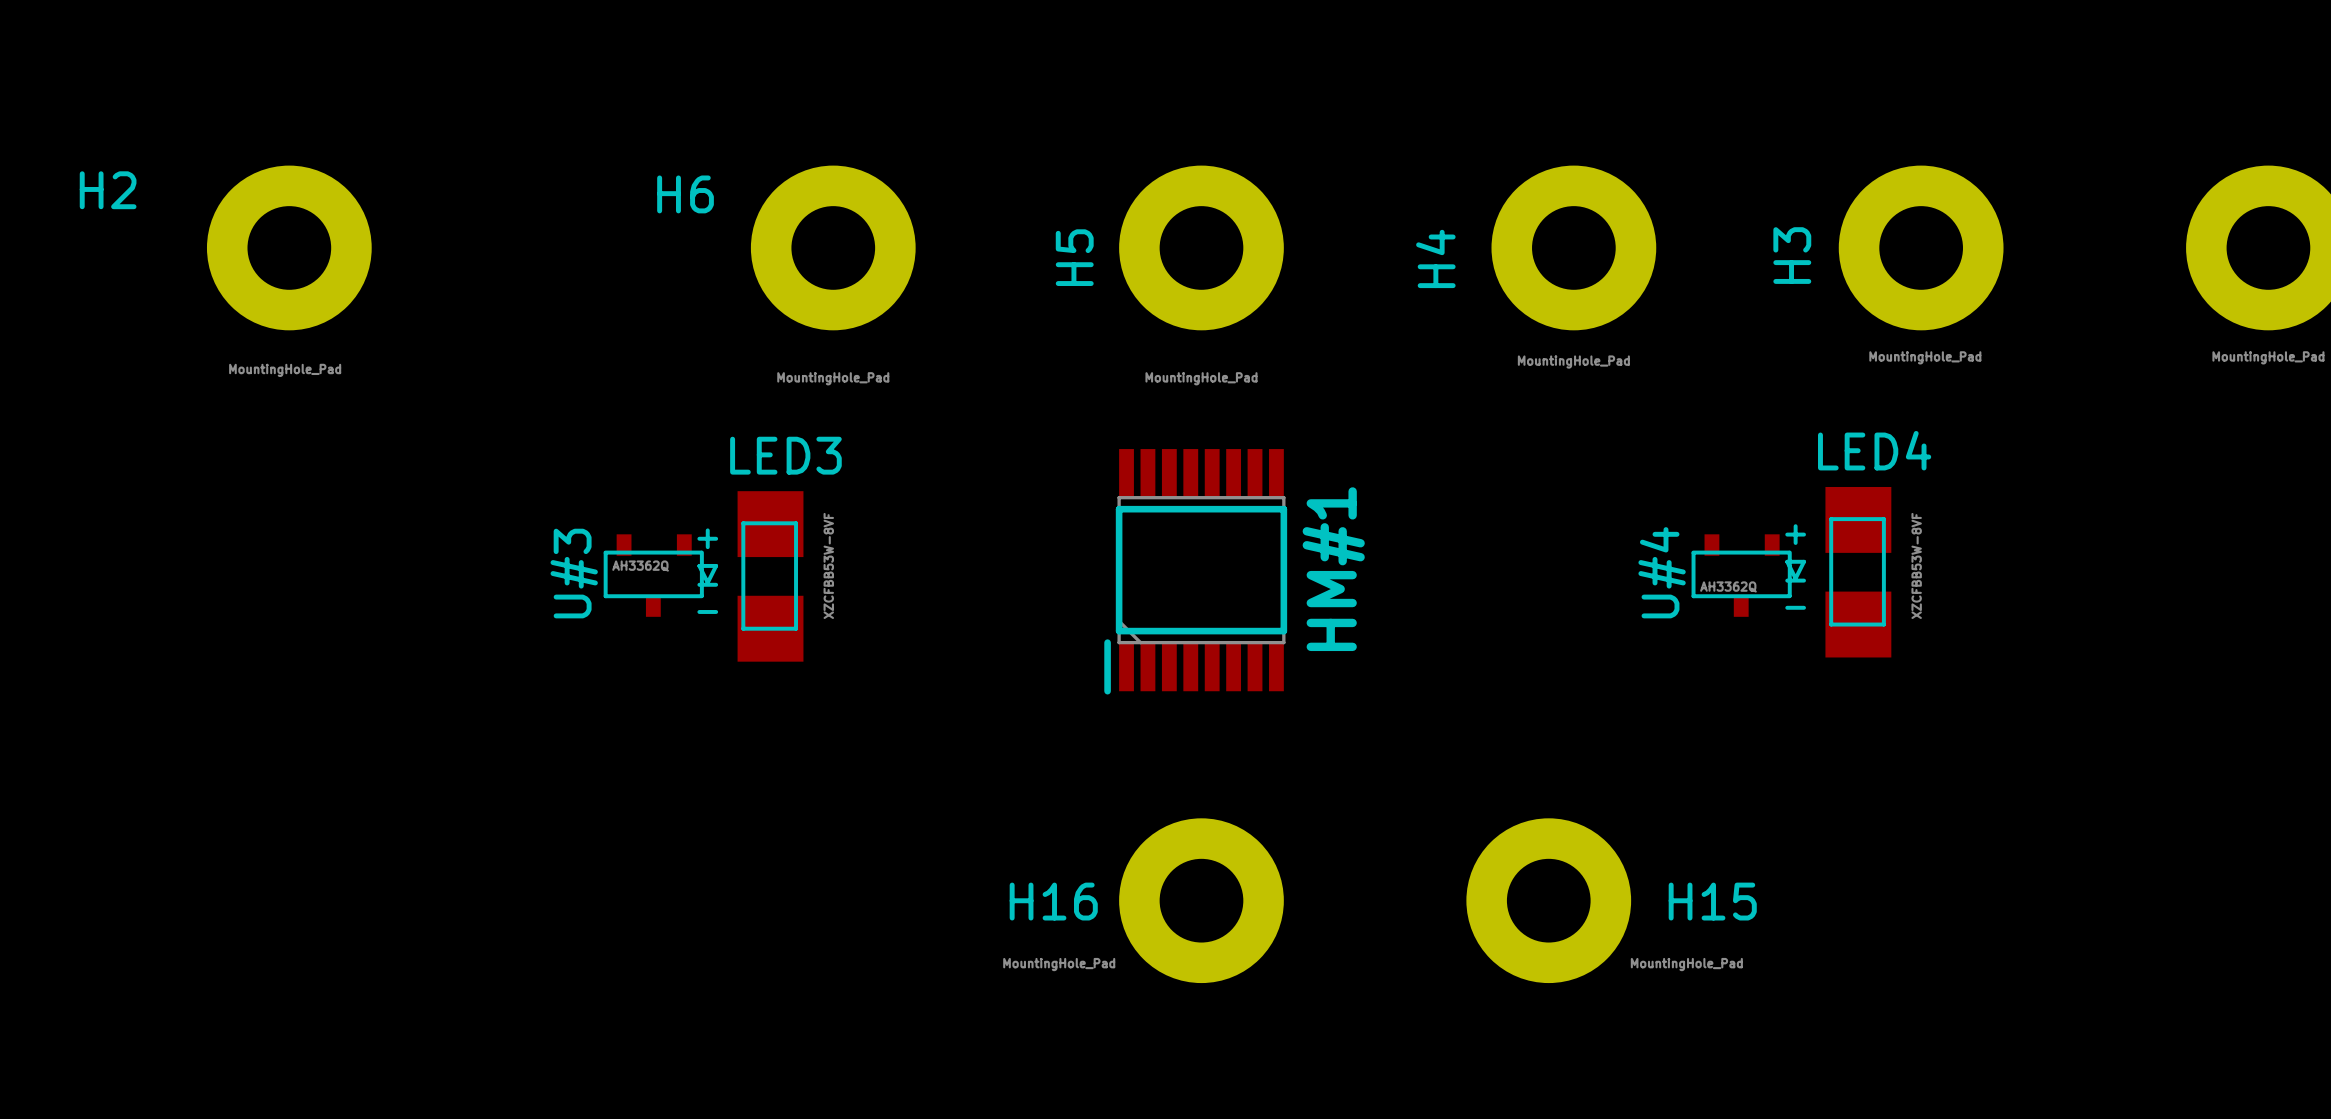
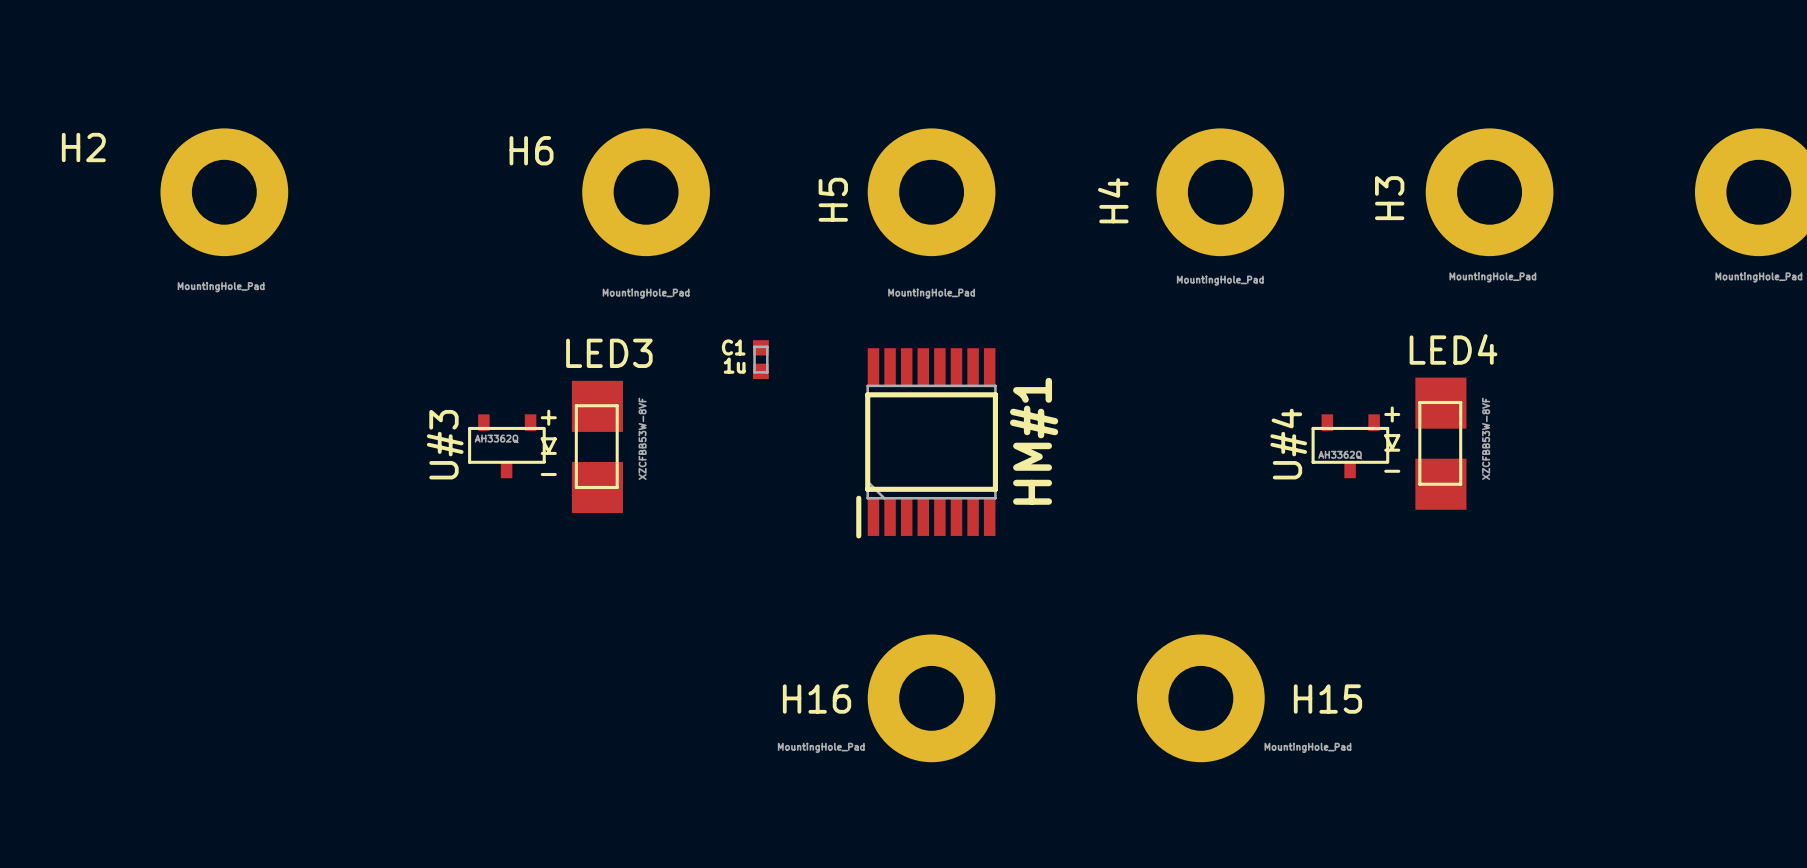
C1: none -> 1u (760, 359)

